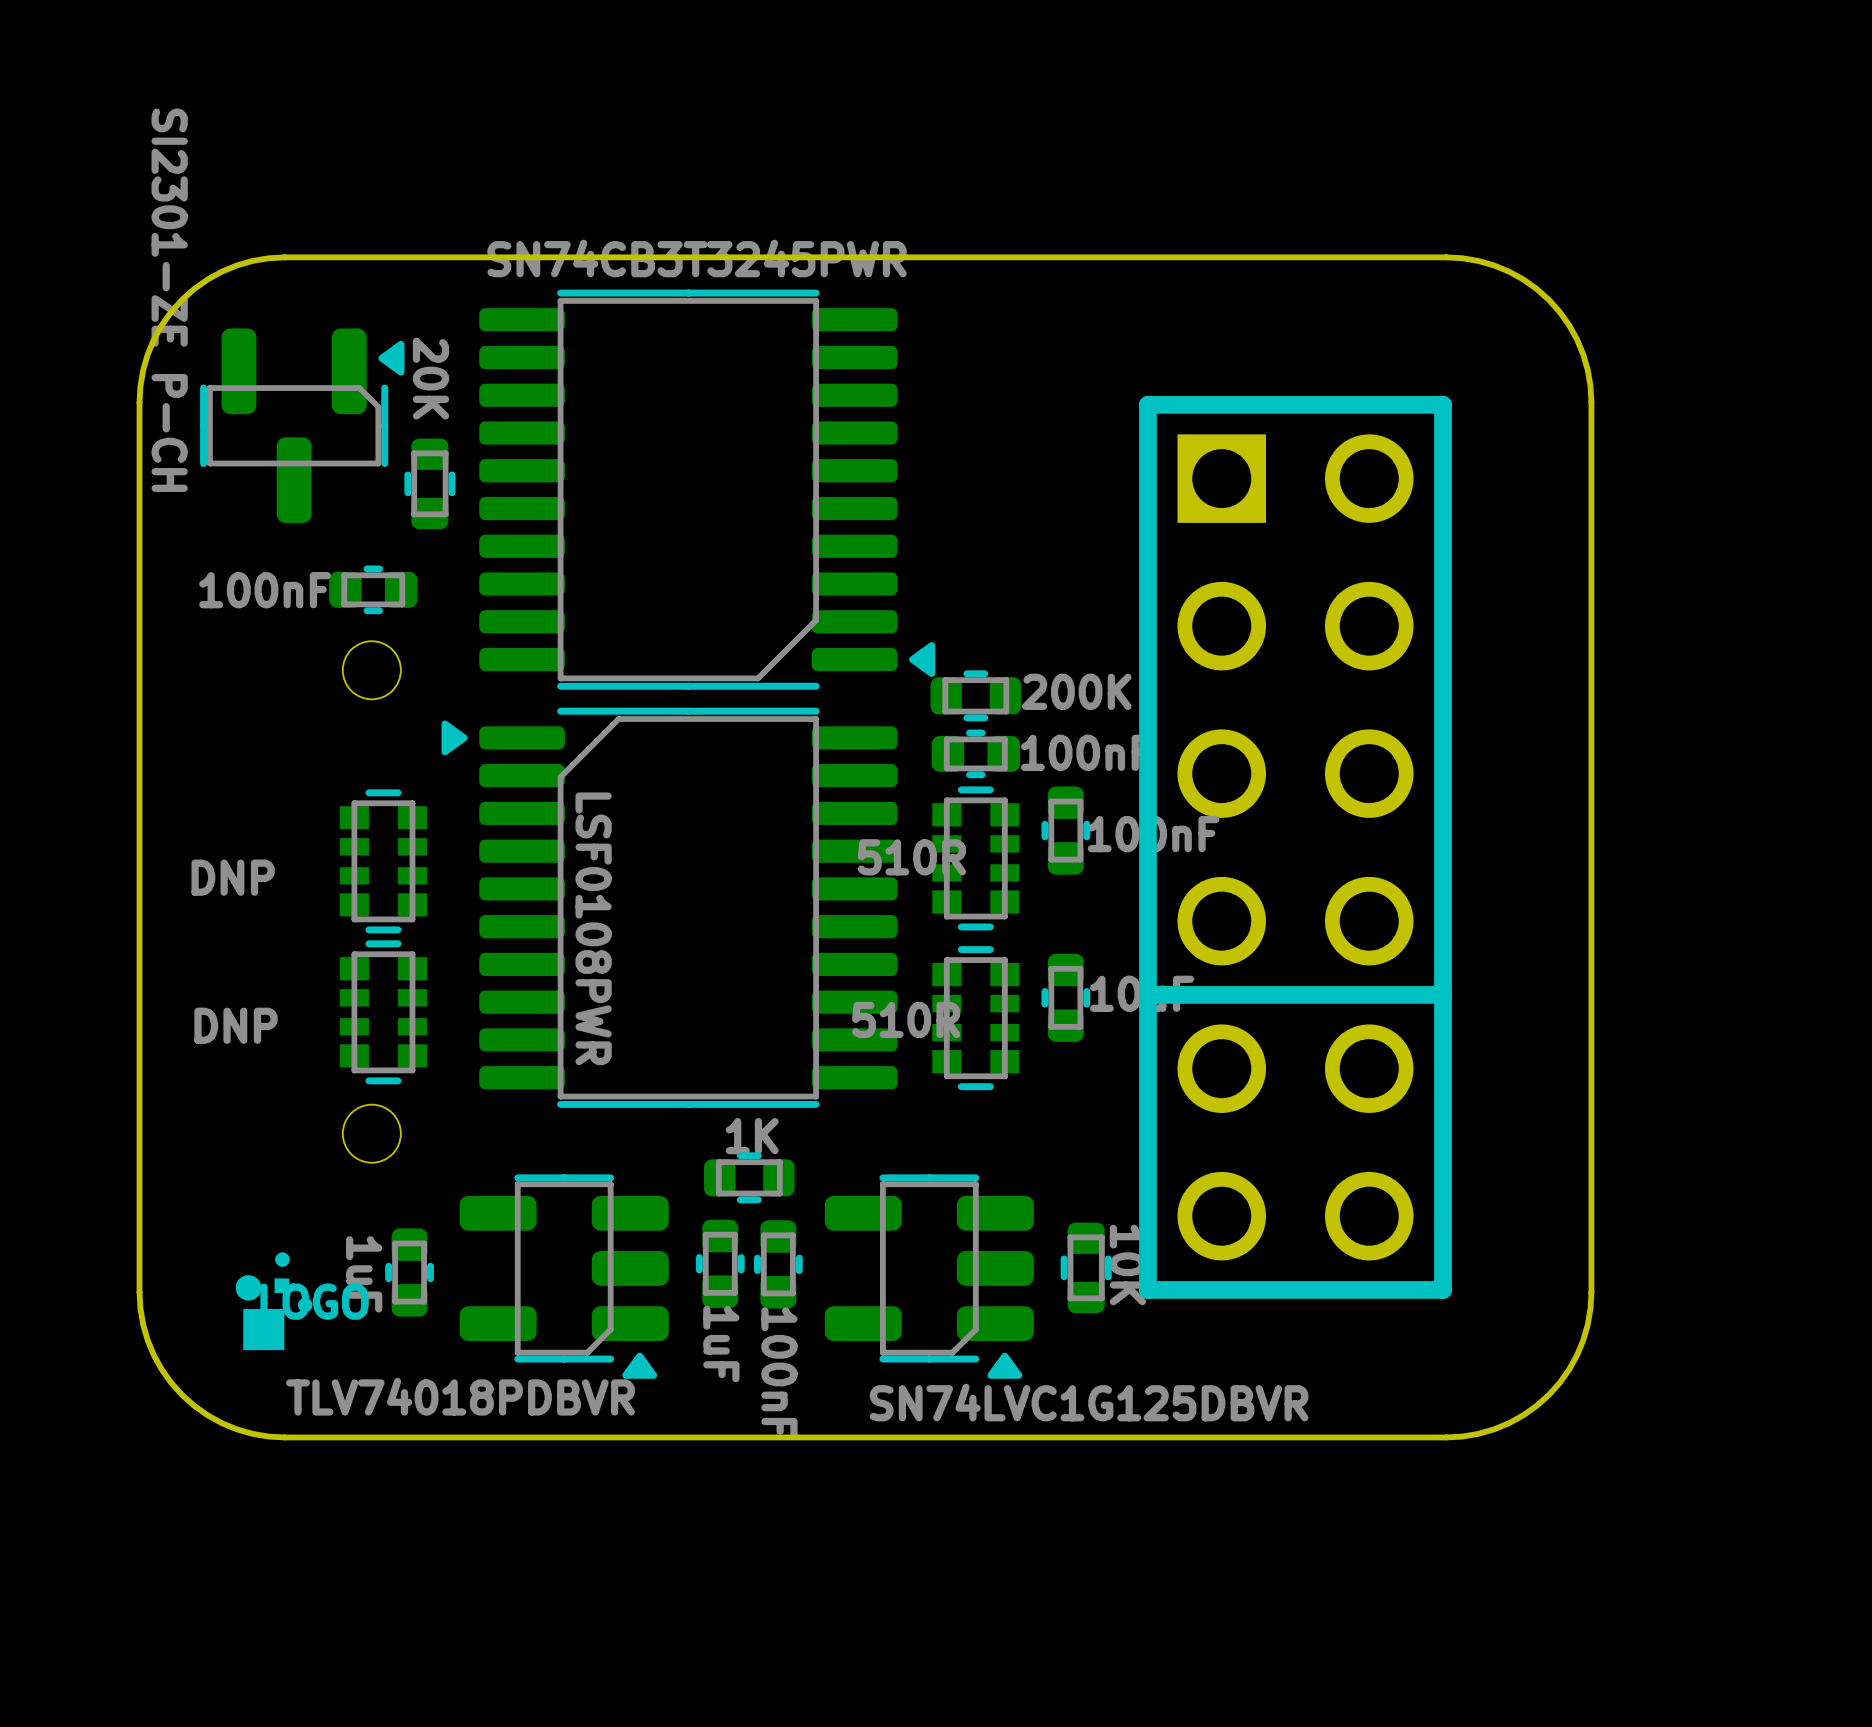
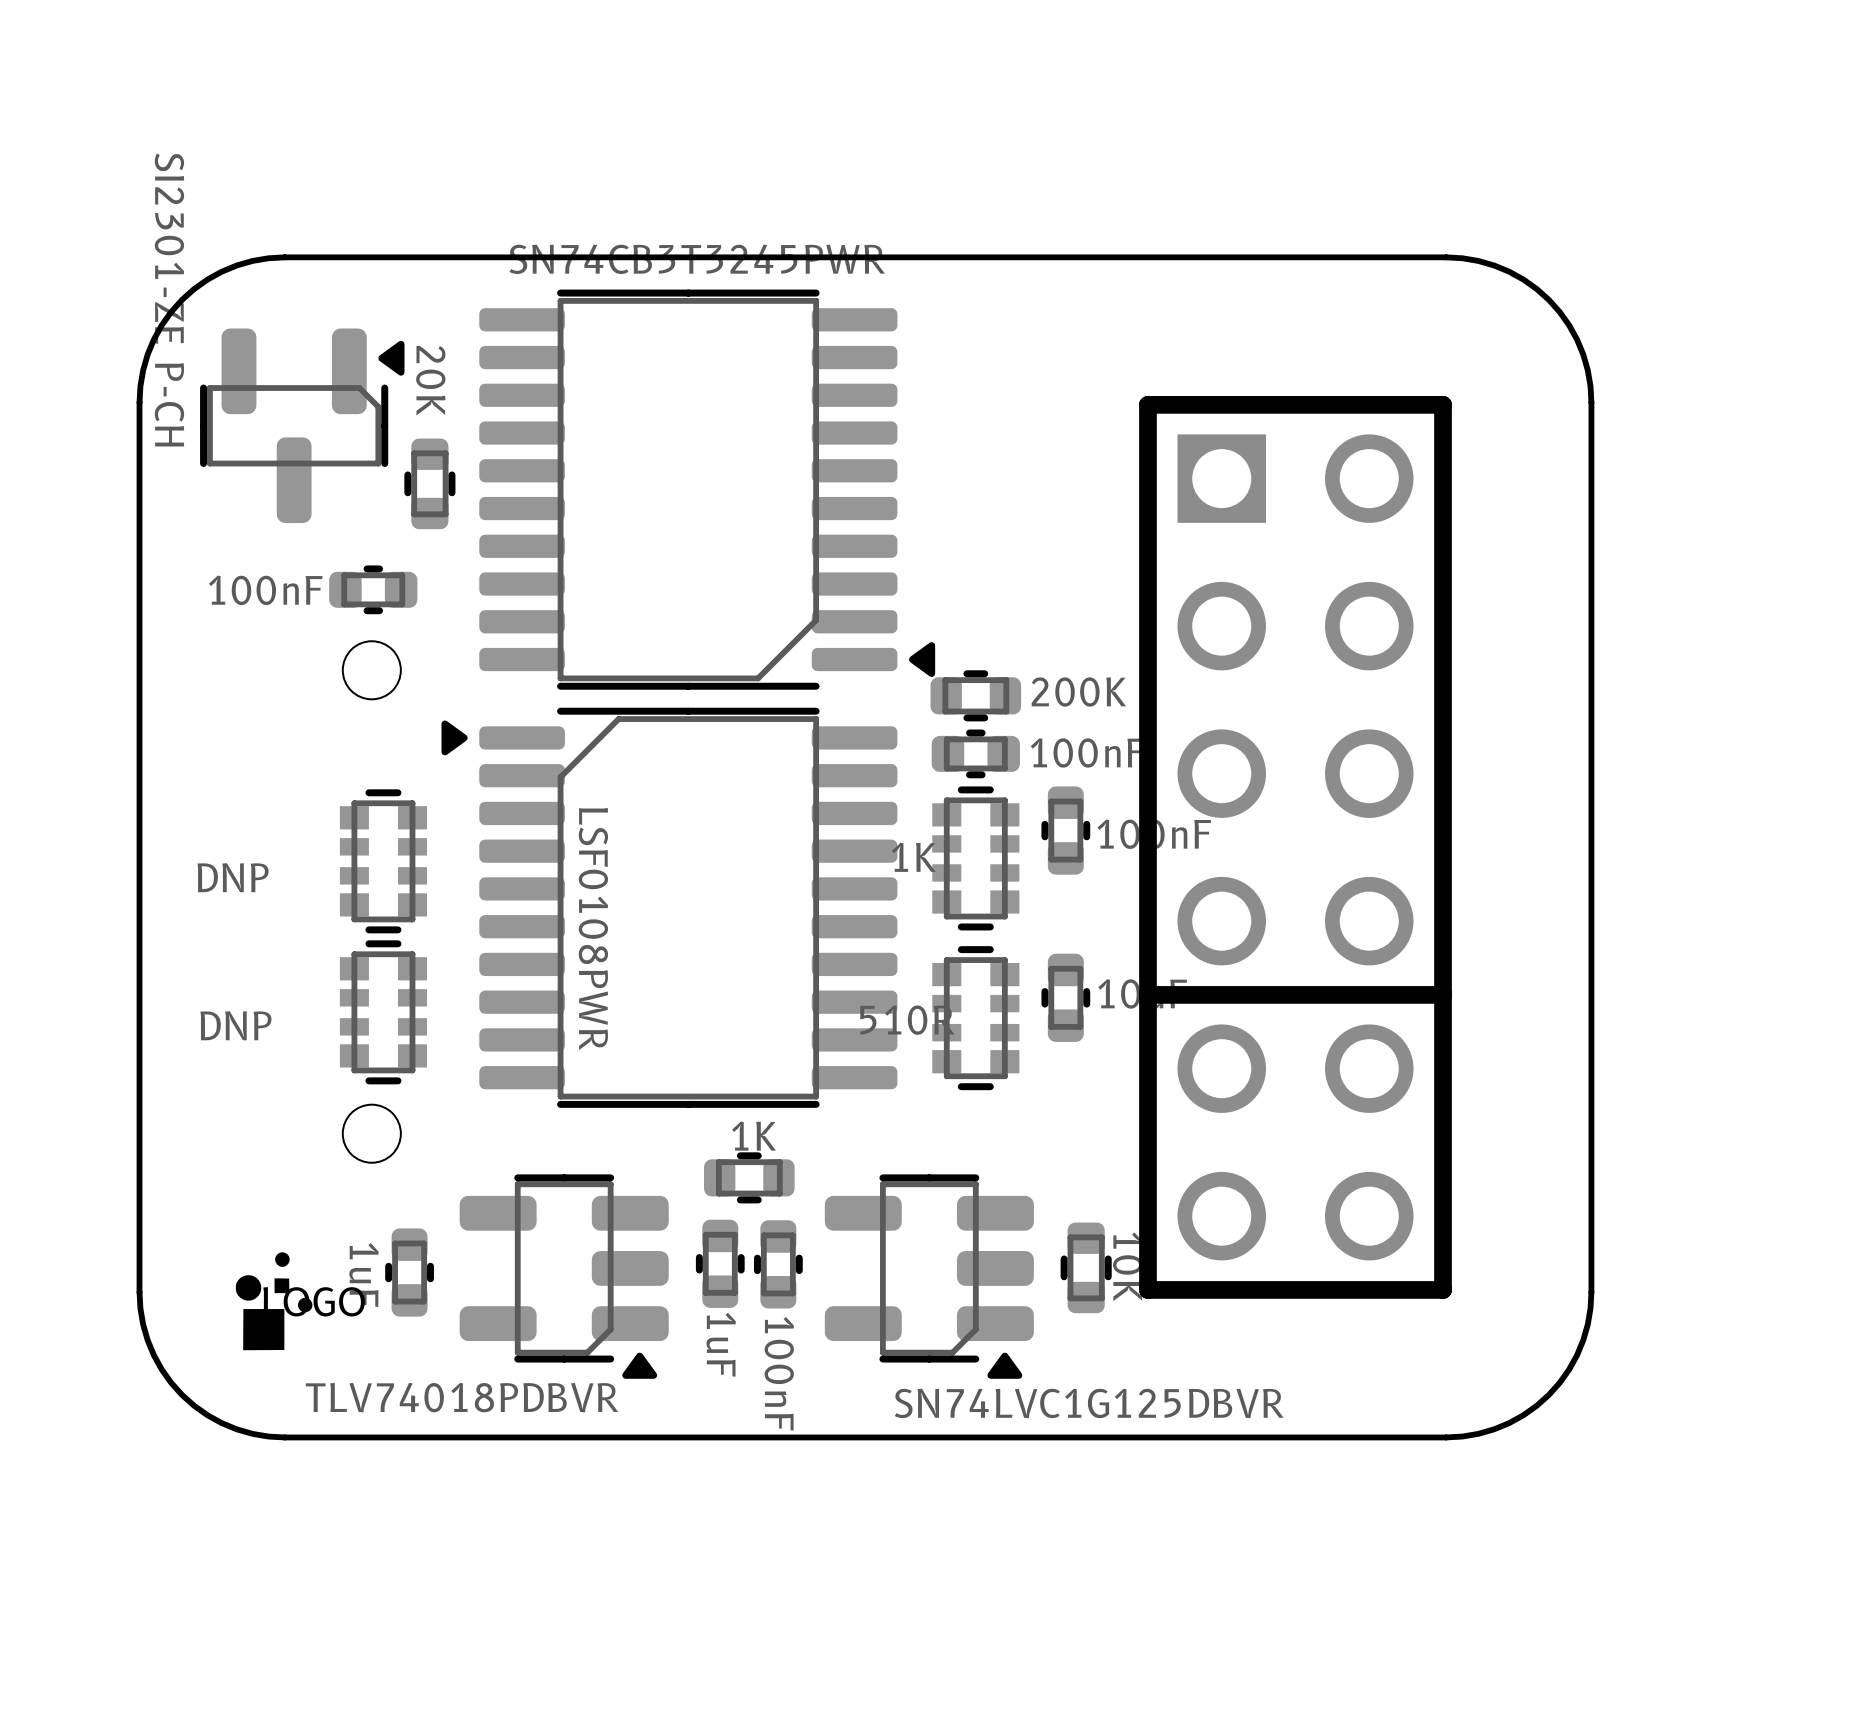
part value: 510R (911, 857) -> 1K (913, 857)

